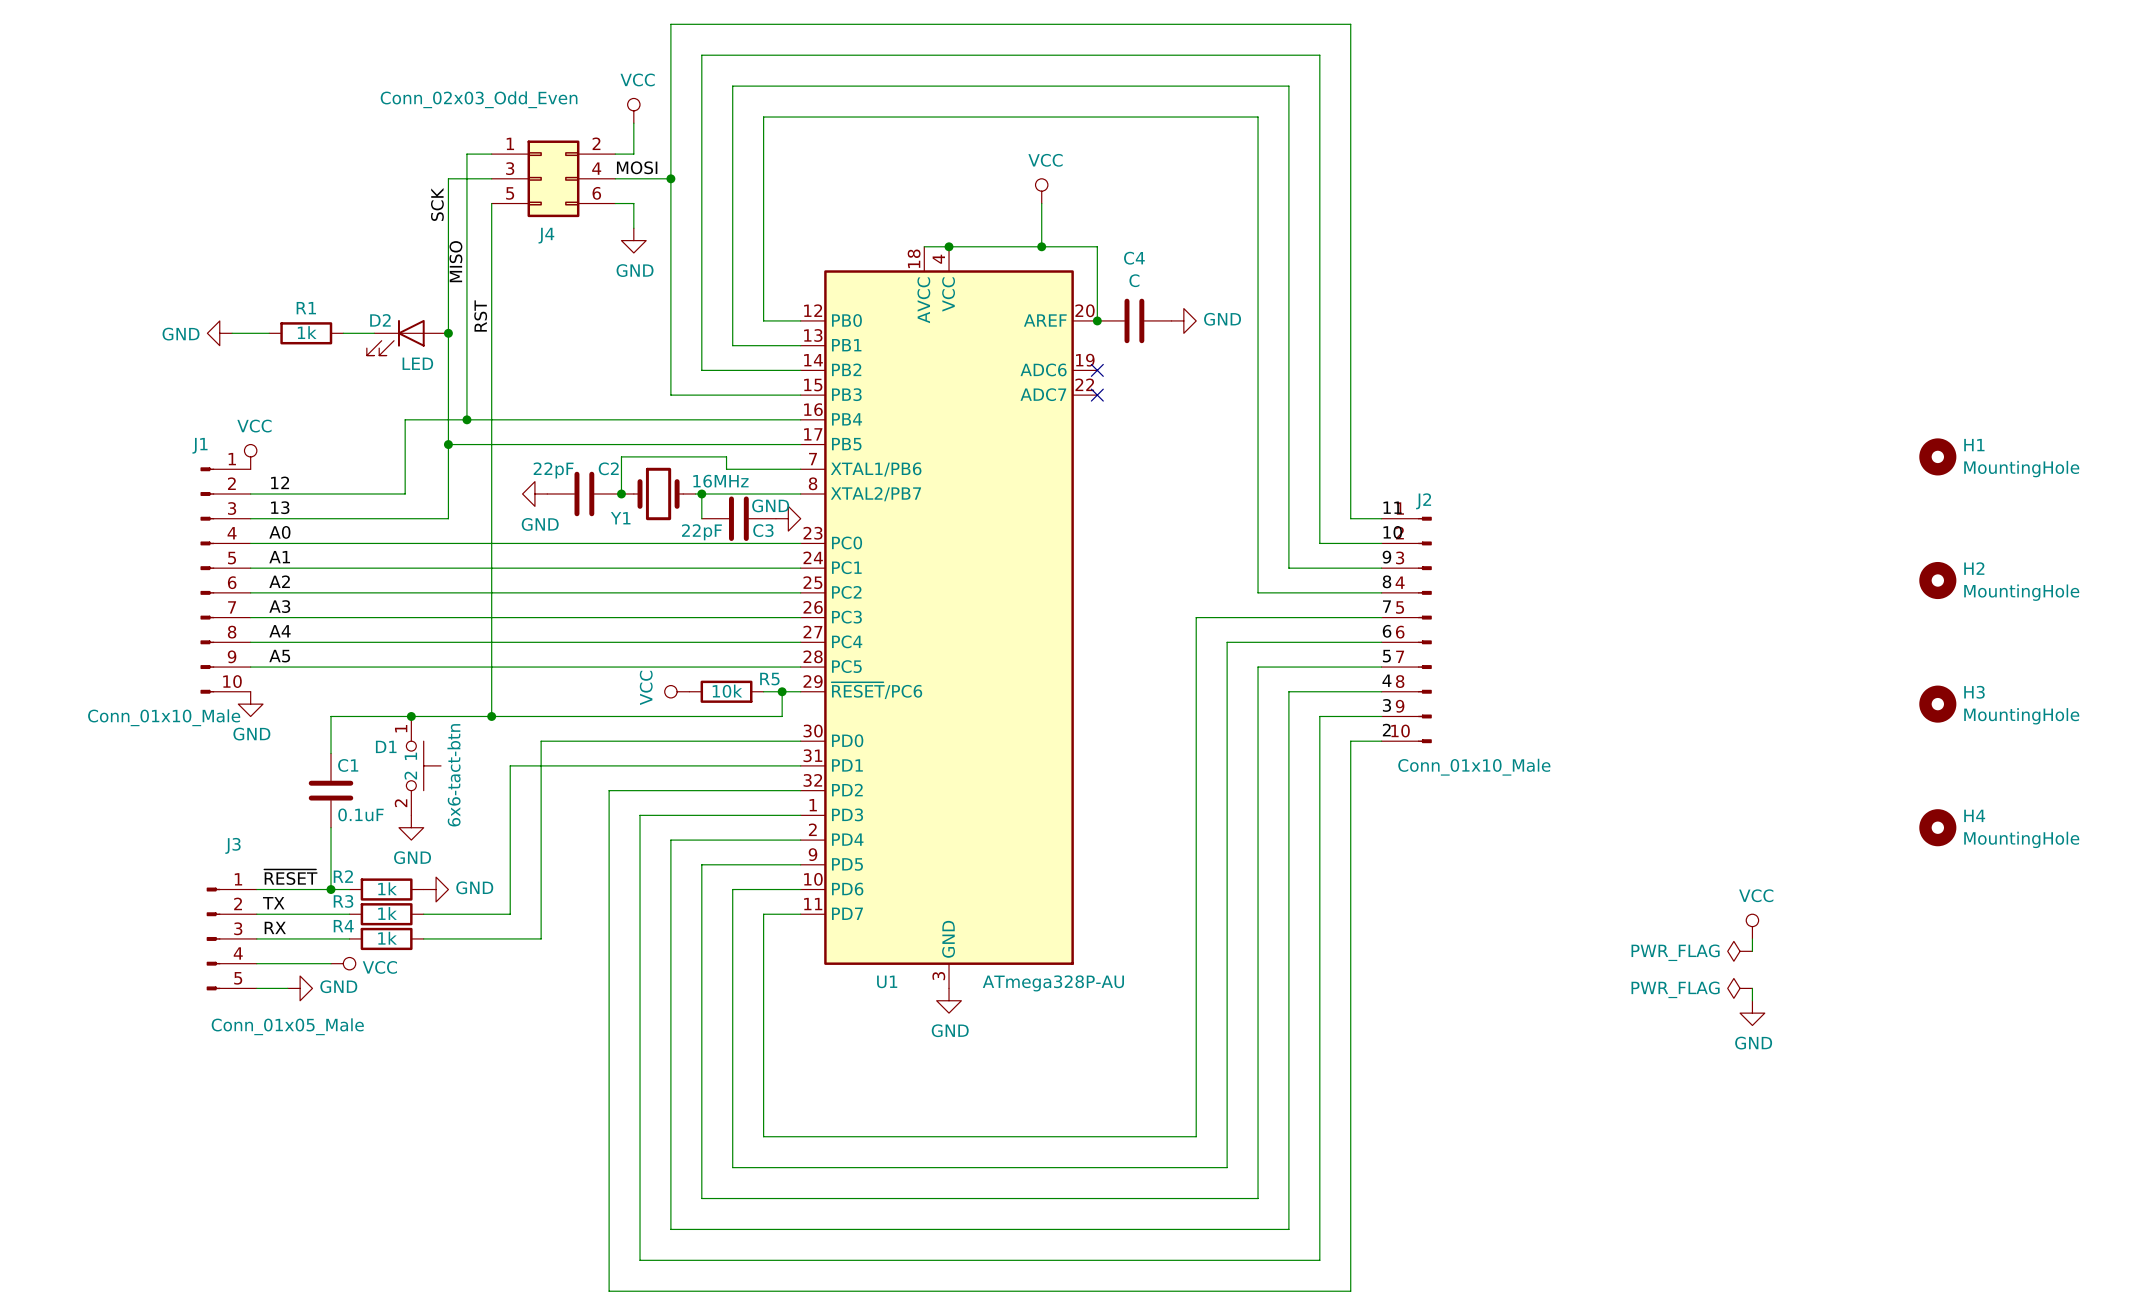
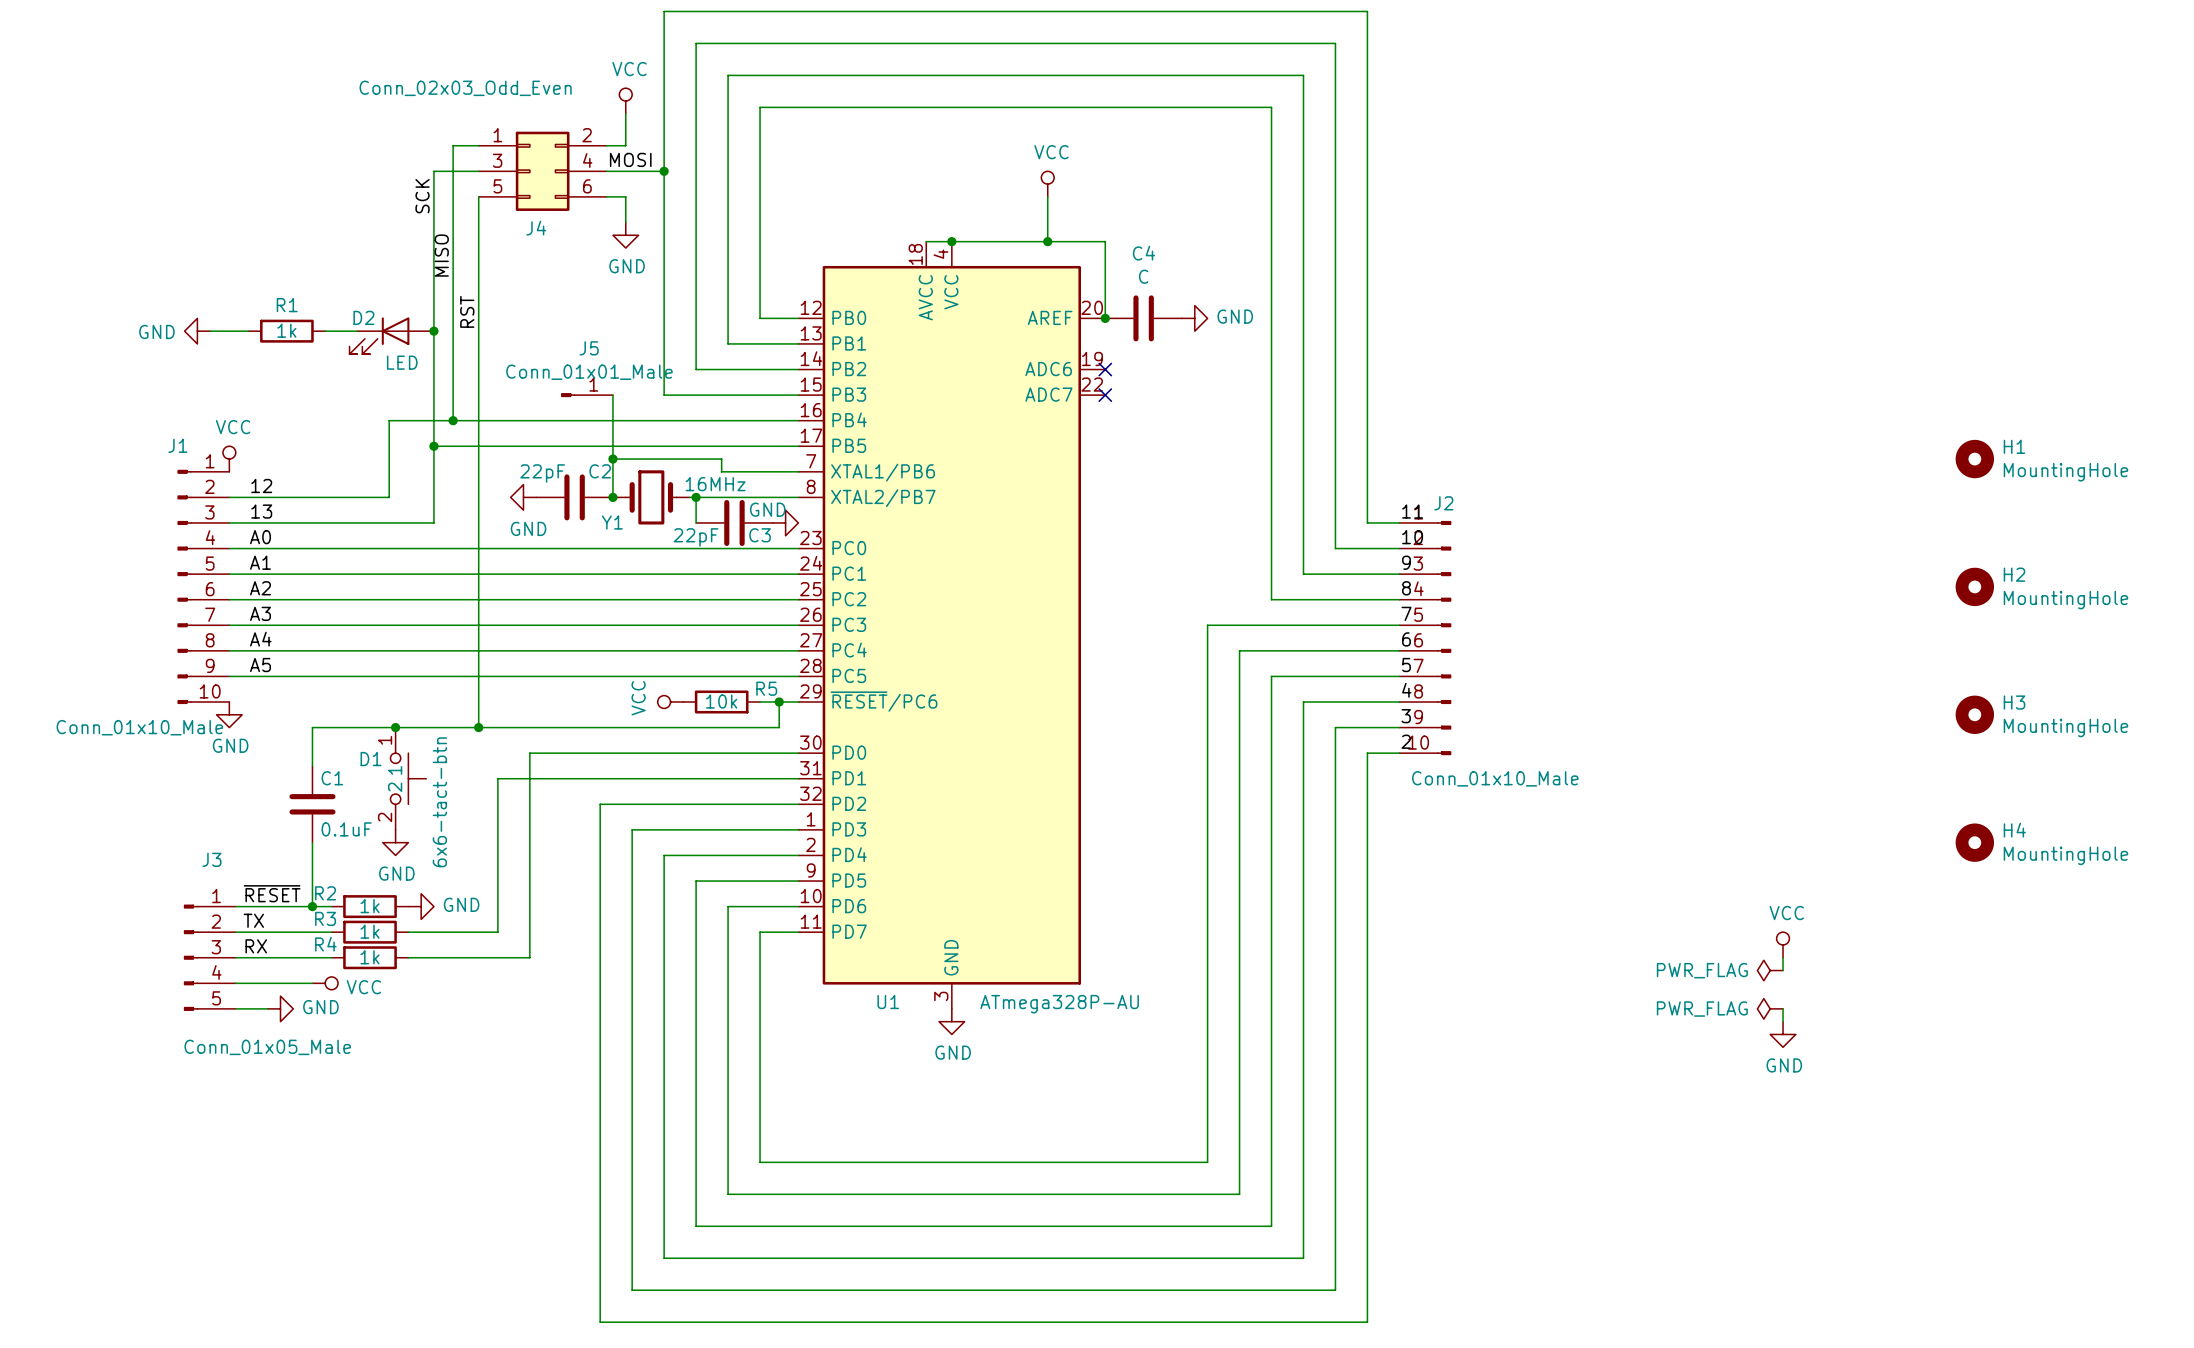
J5: none -> Conn_01x01_Male (587, 395)
wire: none -> (612, 395) (612, 459)
junction: none -> (612, 459)

